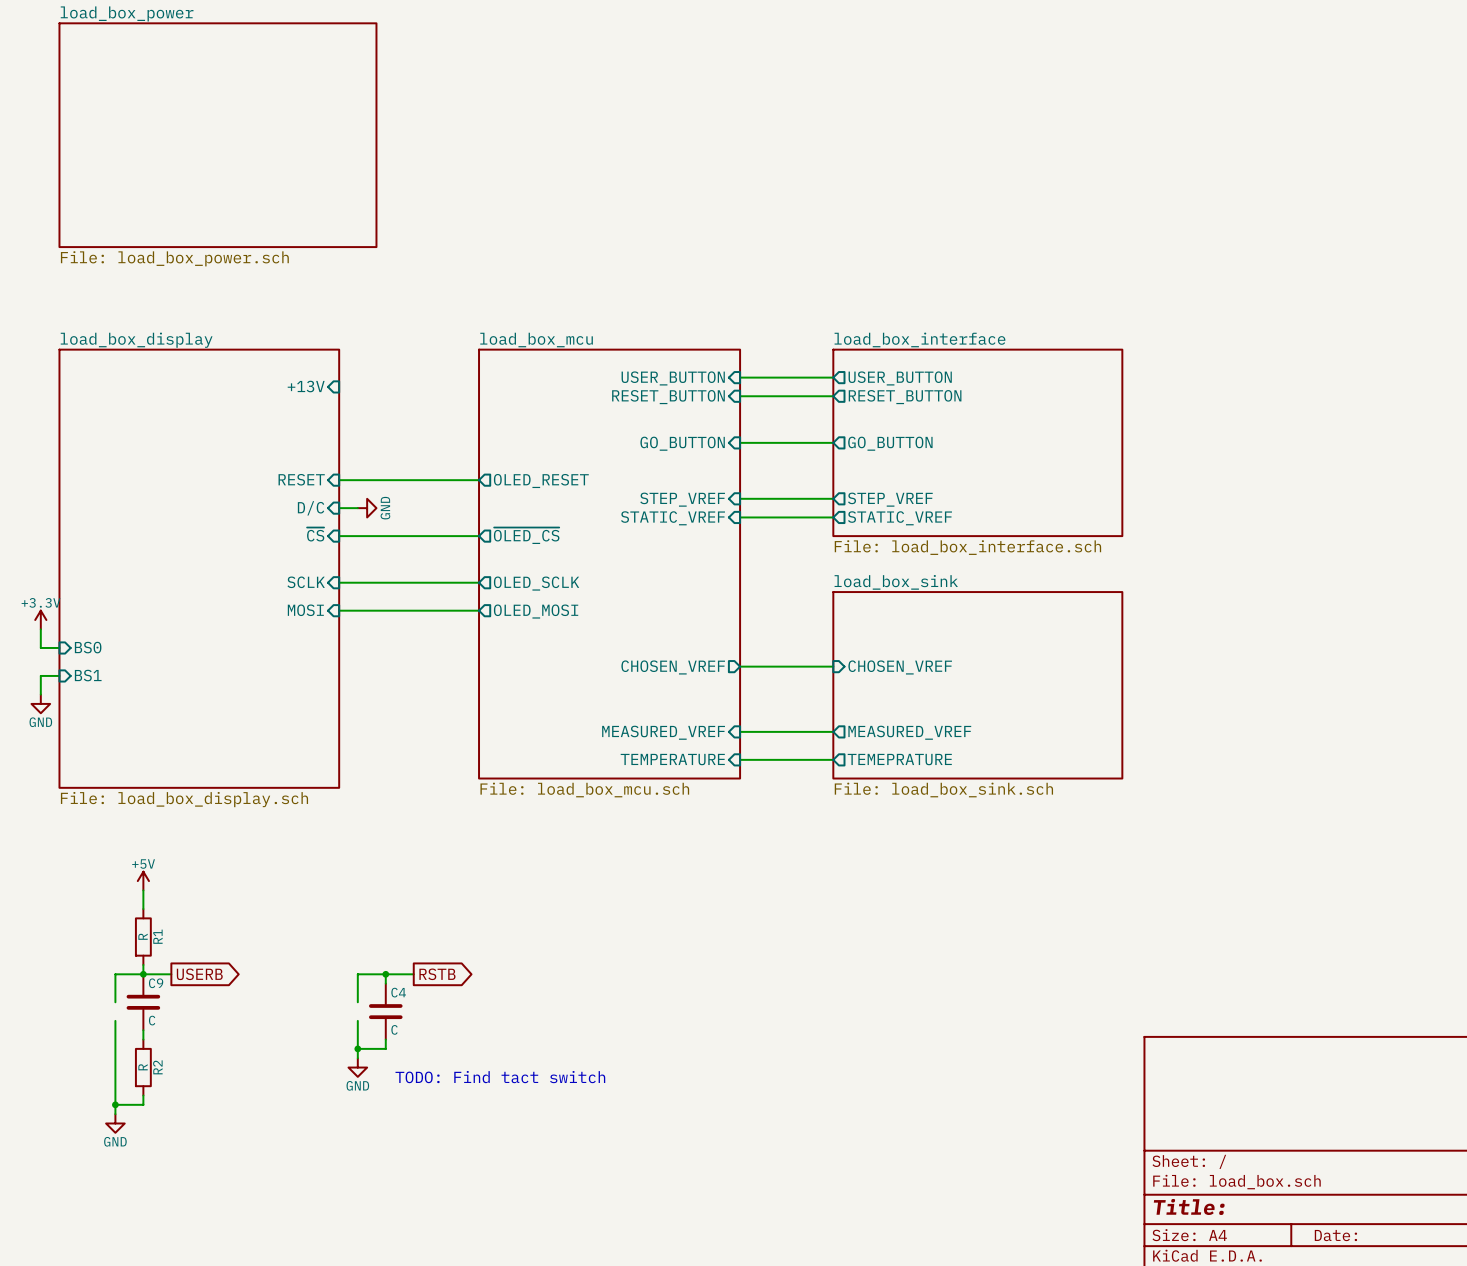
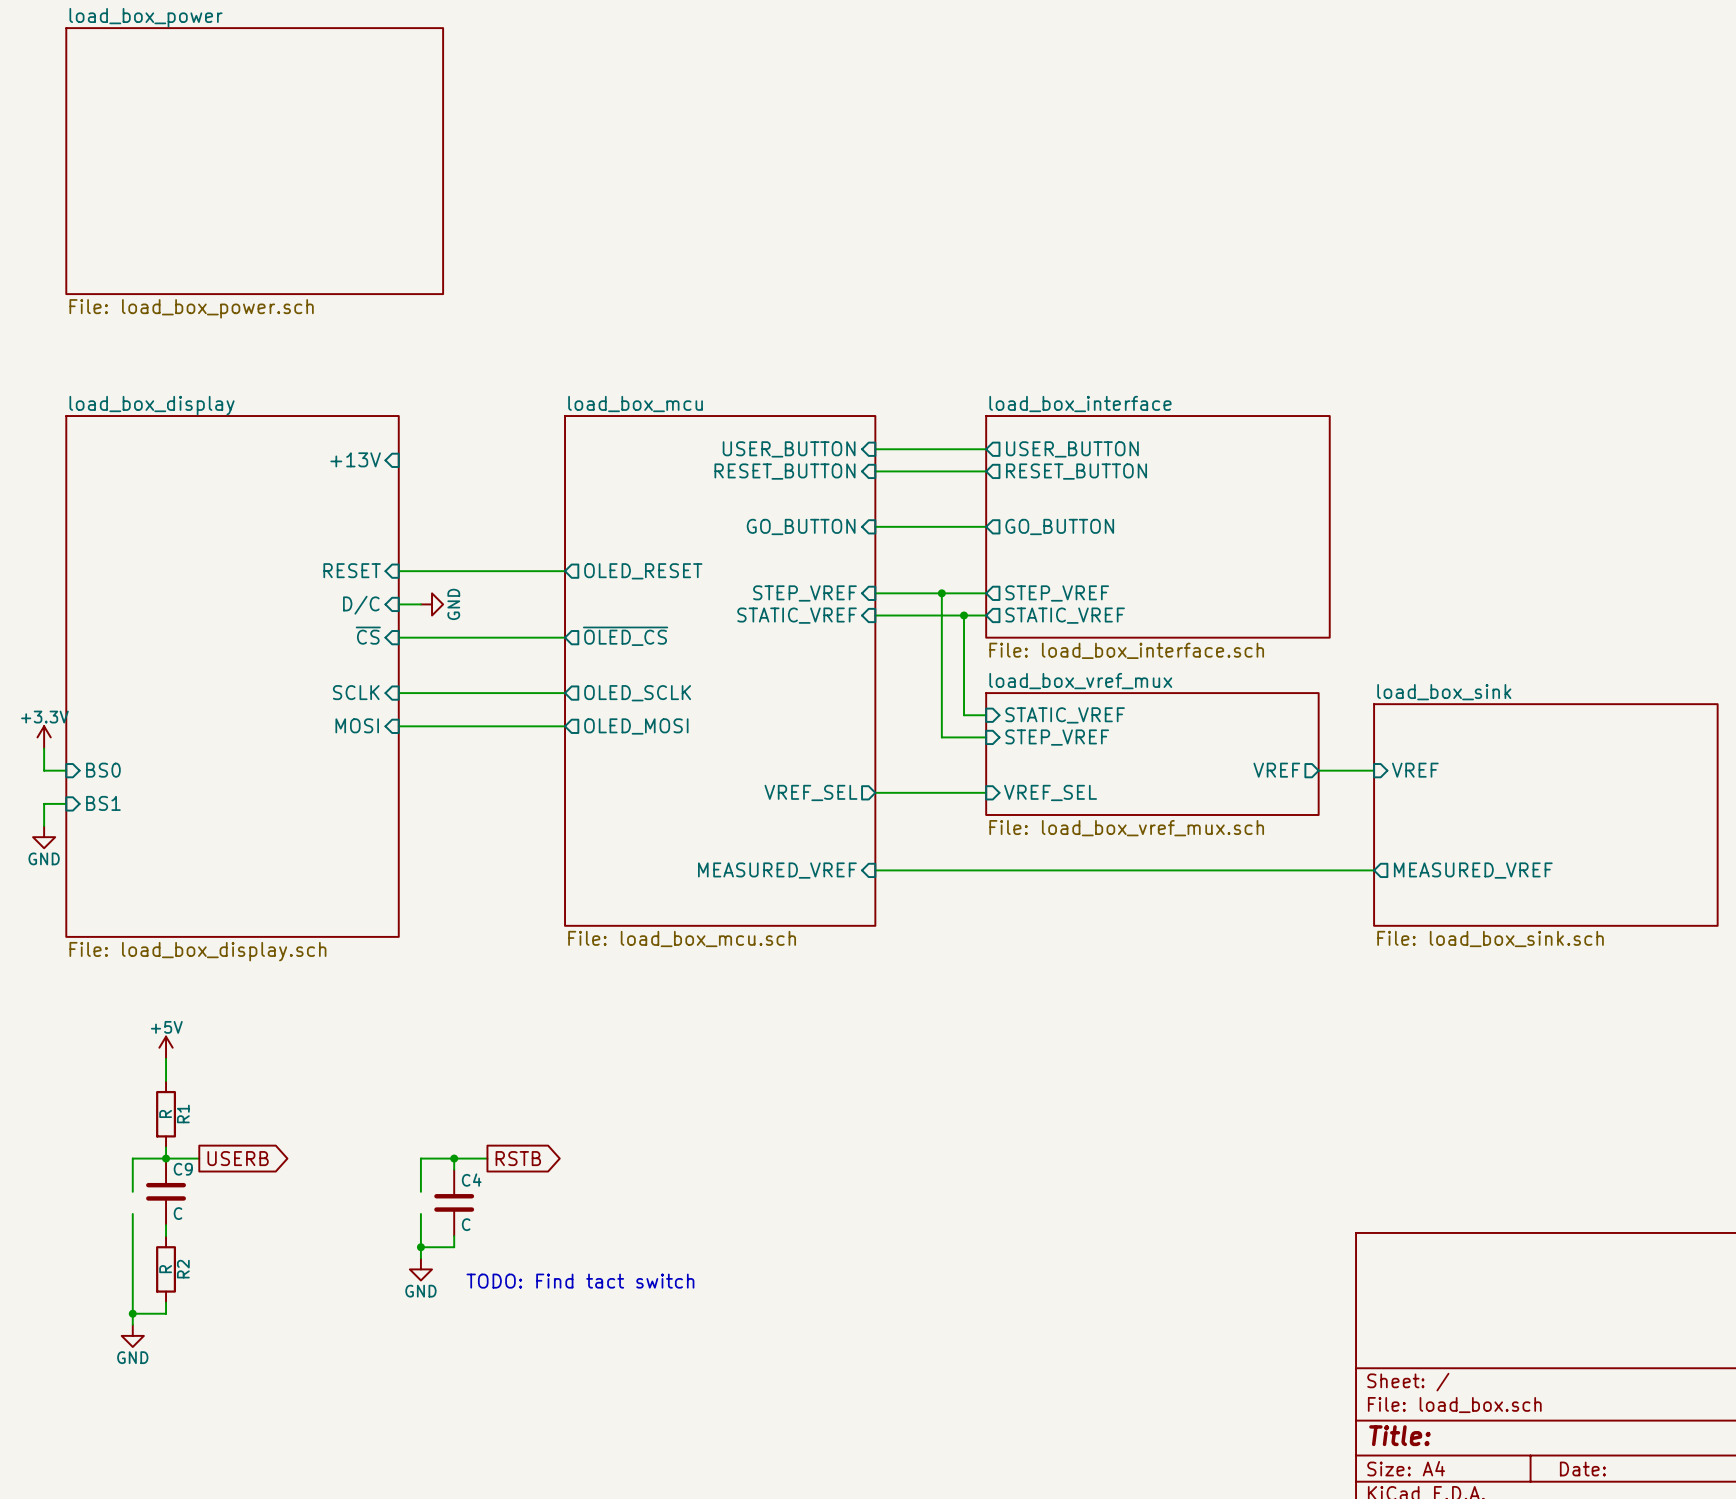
wire: none -> (941, 593) (941, 737) (986, 737)
junction: none -> (941, 593)
wire: none -> (964, 615) (964, 715) (986, 715)
junction: none -> (964, 615)
sheet pin: none -> STATIC_VREF (1065, 715)
sheet pin: none -> STEP_VREF (1057, 737)
sheet load_box_vref_mux: none -> File: load_box_vref_mux.sch (1152, 754)
sheet pin: none -> VREF (1276, 770)
wire: none -> (1318, 770) (1374, 770)
sheet pin: none -> VREF (1415, 770)
sheet pin: CHOSEN_VREF (673, 667) -> VREF_SEL (810, 792)
sheet pin: CHOSEN_VREF (900, 667) -> VREF_SEL (1050, 792)
sheet load_box_sink: File: load_box_sink.sch (977, 685) -> none
sheet load_box_sink: none -> File: load_box_sink.sch (1545, 815)
wire: none -> (986, 870) (1374, 870)
sheet pin: MEASURED_VREF (909, 732) -> none
sheet pin: none -> MEASURED_VREF (1473, 870)
sheet pin: TEMPERATURE (672, 759) -> none
wire: (740, 759) (833, 759) -> none
sheet pin: TEMEPRATURE (899, 759) -> none

